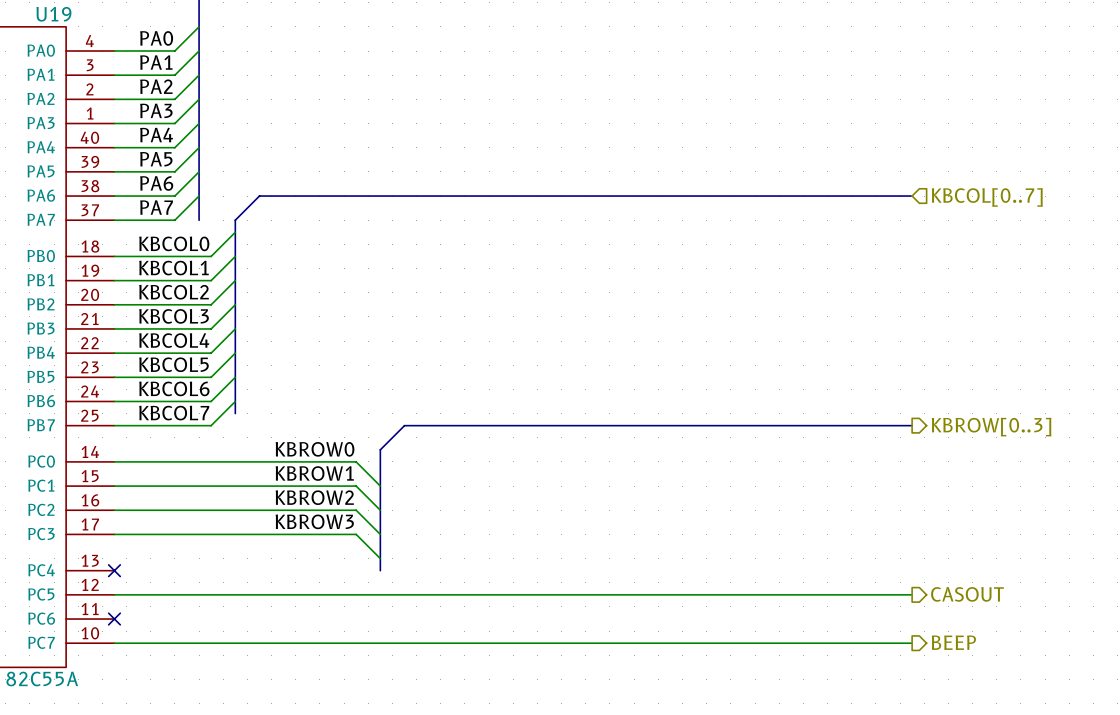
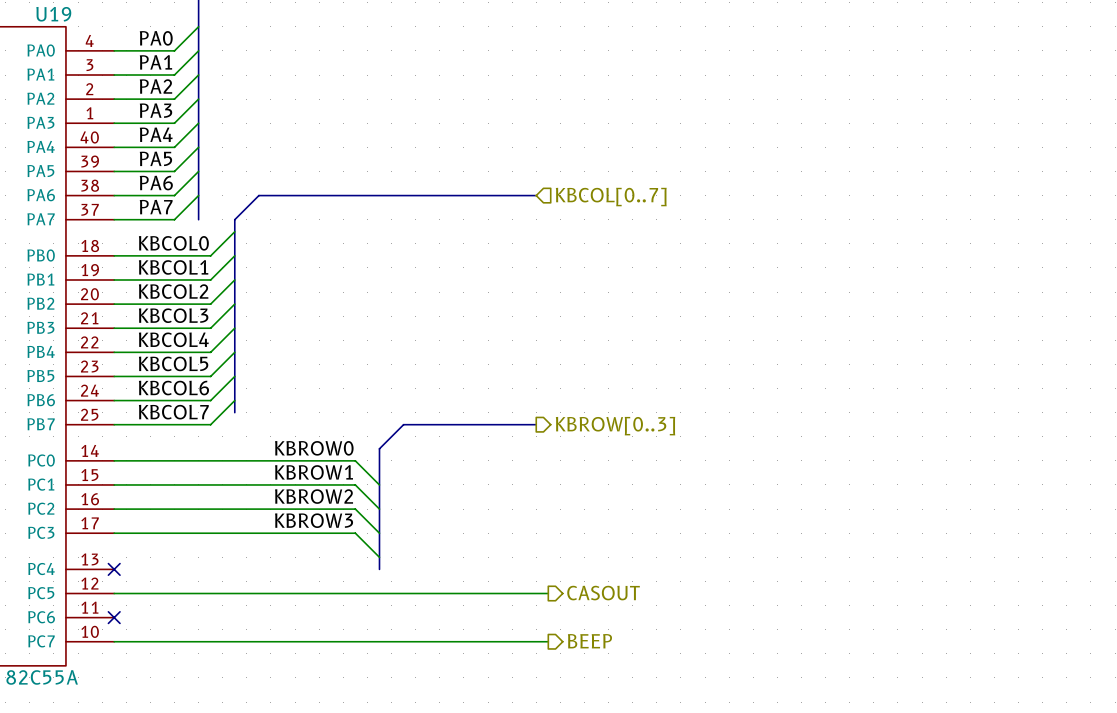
bus: (537, 196) (912, 196) -> none
hierarchical label: none -> KBCOL[0..7] (611, 197)
hierarchical label: KBCOL[0..7] (987, 197) -> none
bus: (537, 425) (912, 425) -> none
hierarchical label: none -> KBROW[0..3] (615, 426)
hierarchical label: KBROW[0..3] (991, 427) -> none
wire: (549, 594) (912, 594) -> none
hierarchical label: none -> CASOUT (603, 593)
hierarchical label: CASOUT (967, 594) -> none
hierarchical label: none -> BEEP (589, 641)
hierarchical label: BEEP (953, 642) -> none
wire: (549, 643) (912, 643) -> none

